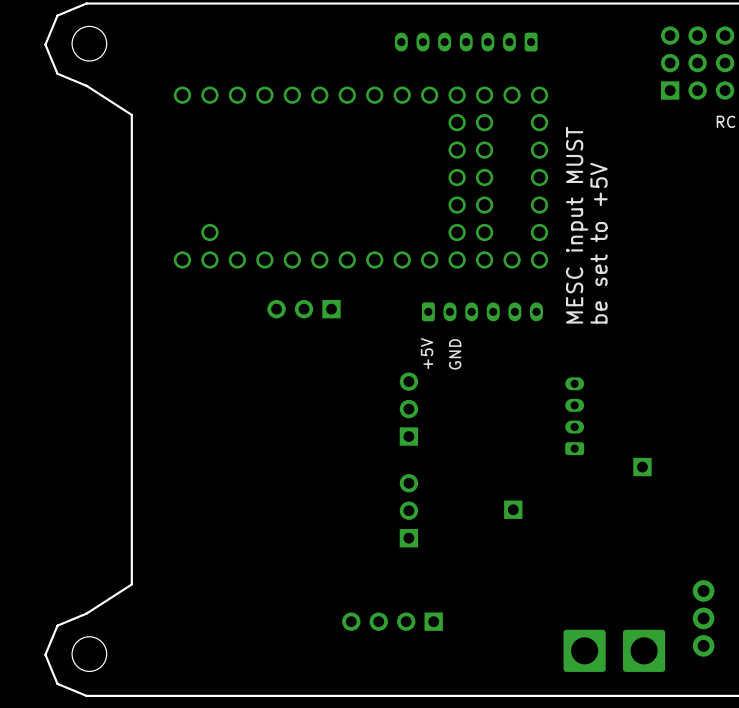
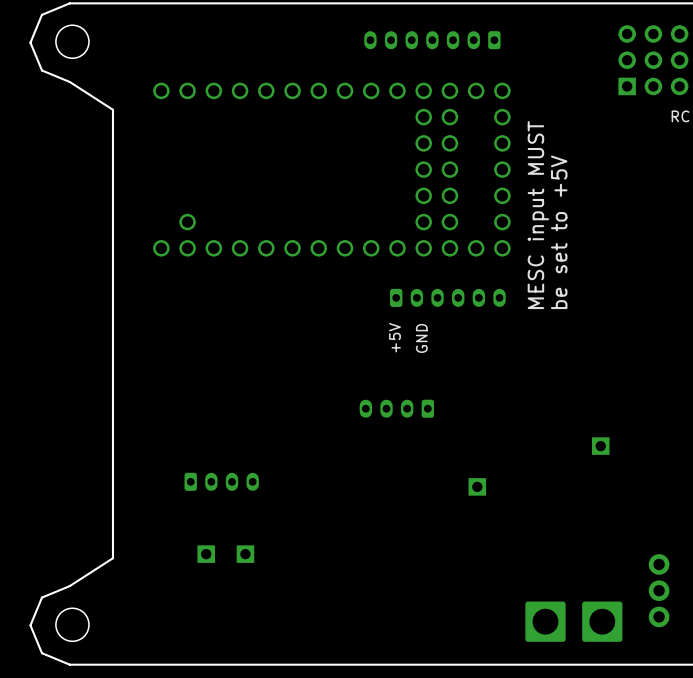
part: (304, 309) -> none
part: (408, 409) -> none
part rotation: 0° (574, 416) -> 90° counterclockwise (396, 408)
part position: (574, 416) -> (396, 408)
part: none -> (221, 481)
part: (408, 510) -> none
part: none -> (206, 554)
part: none -> (245, 554)
part: (392, 621) -> none

